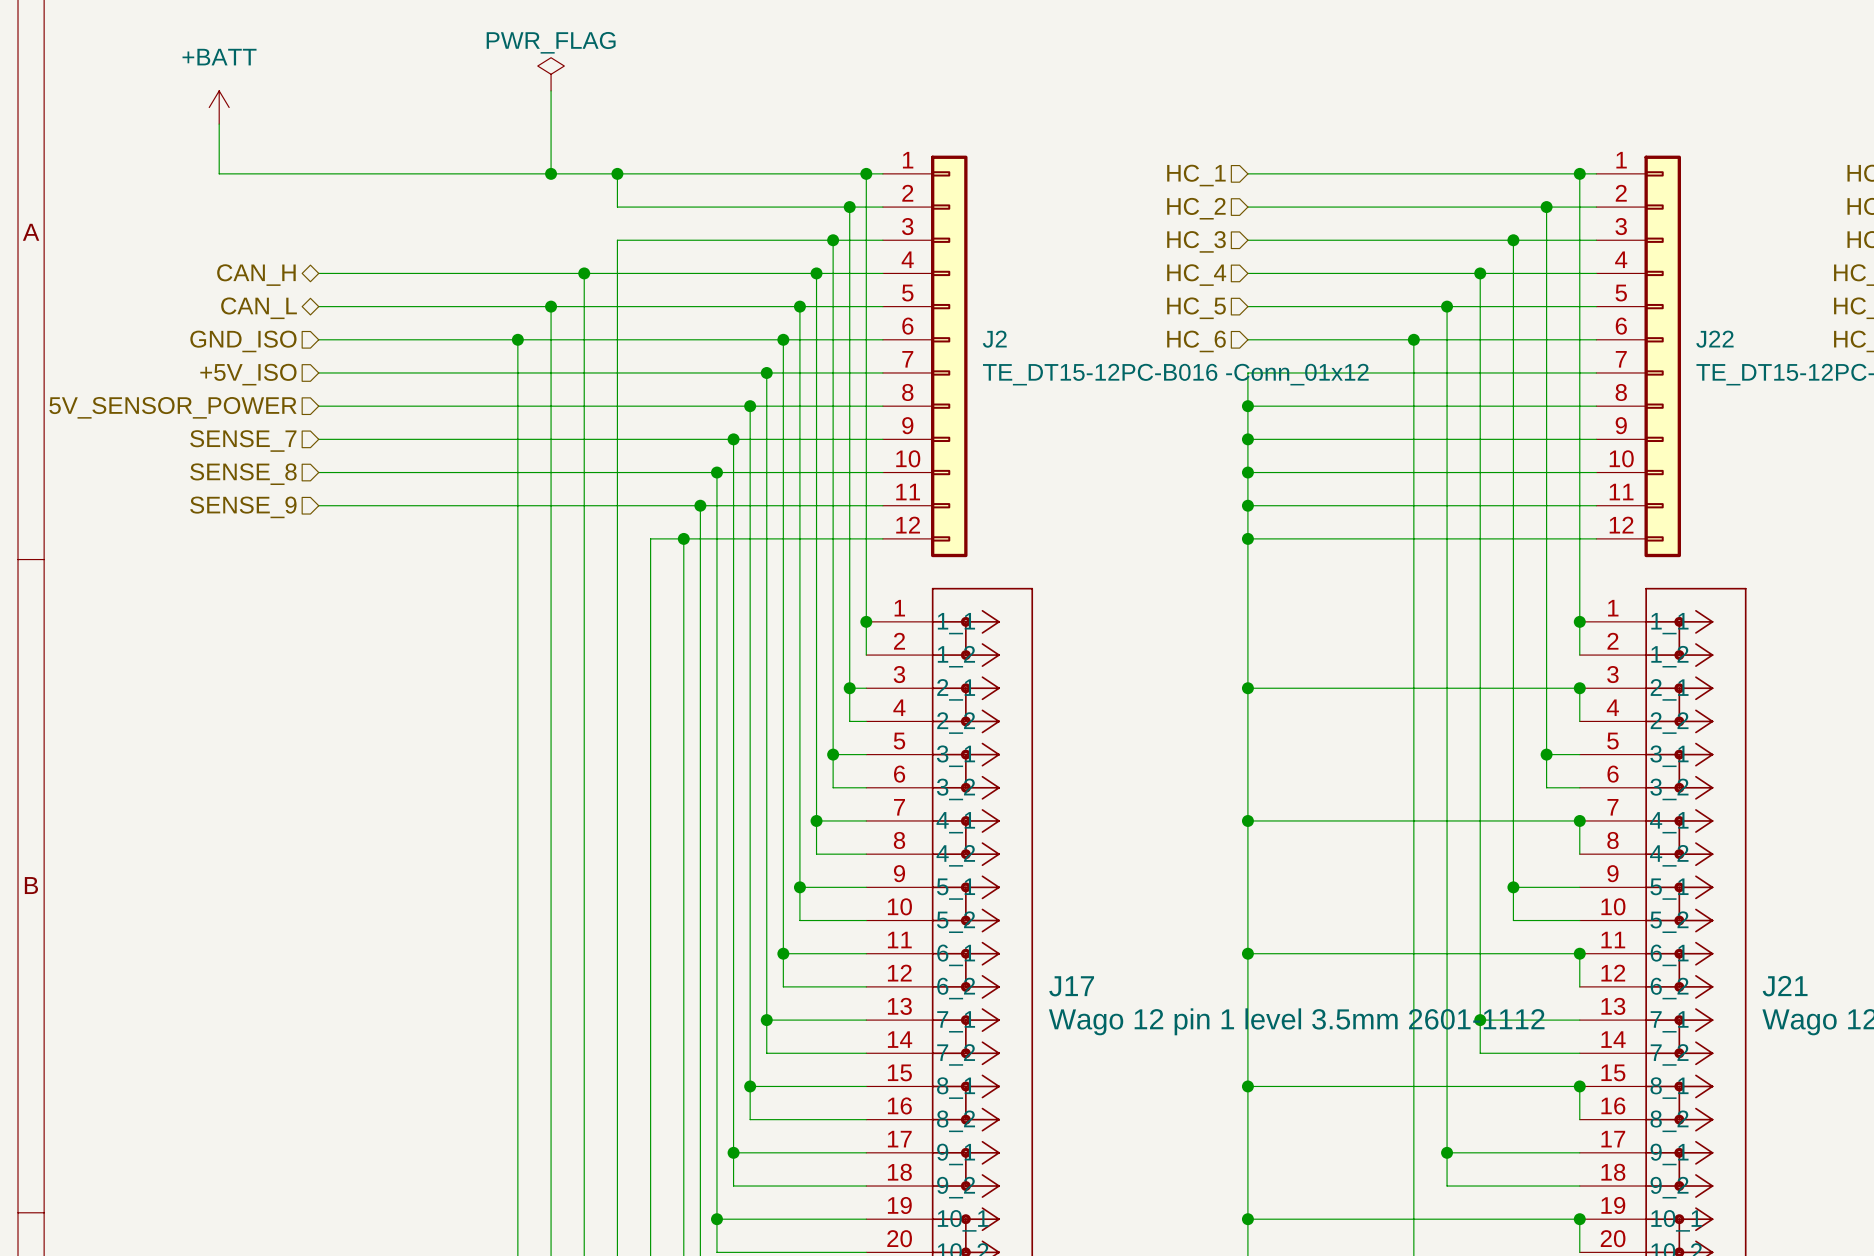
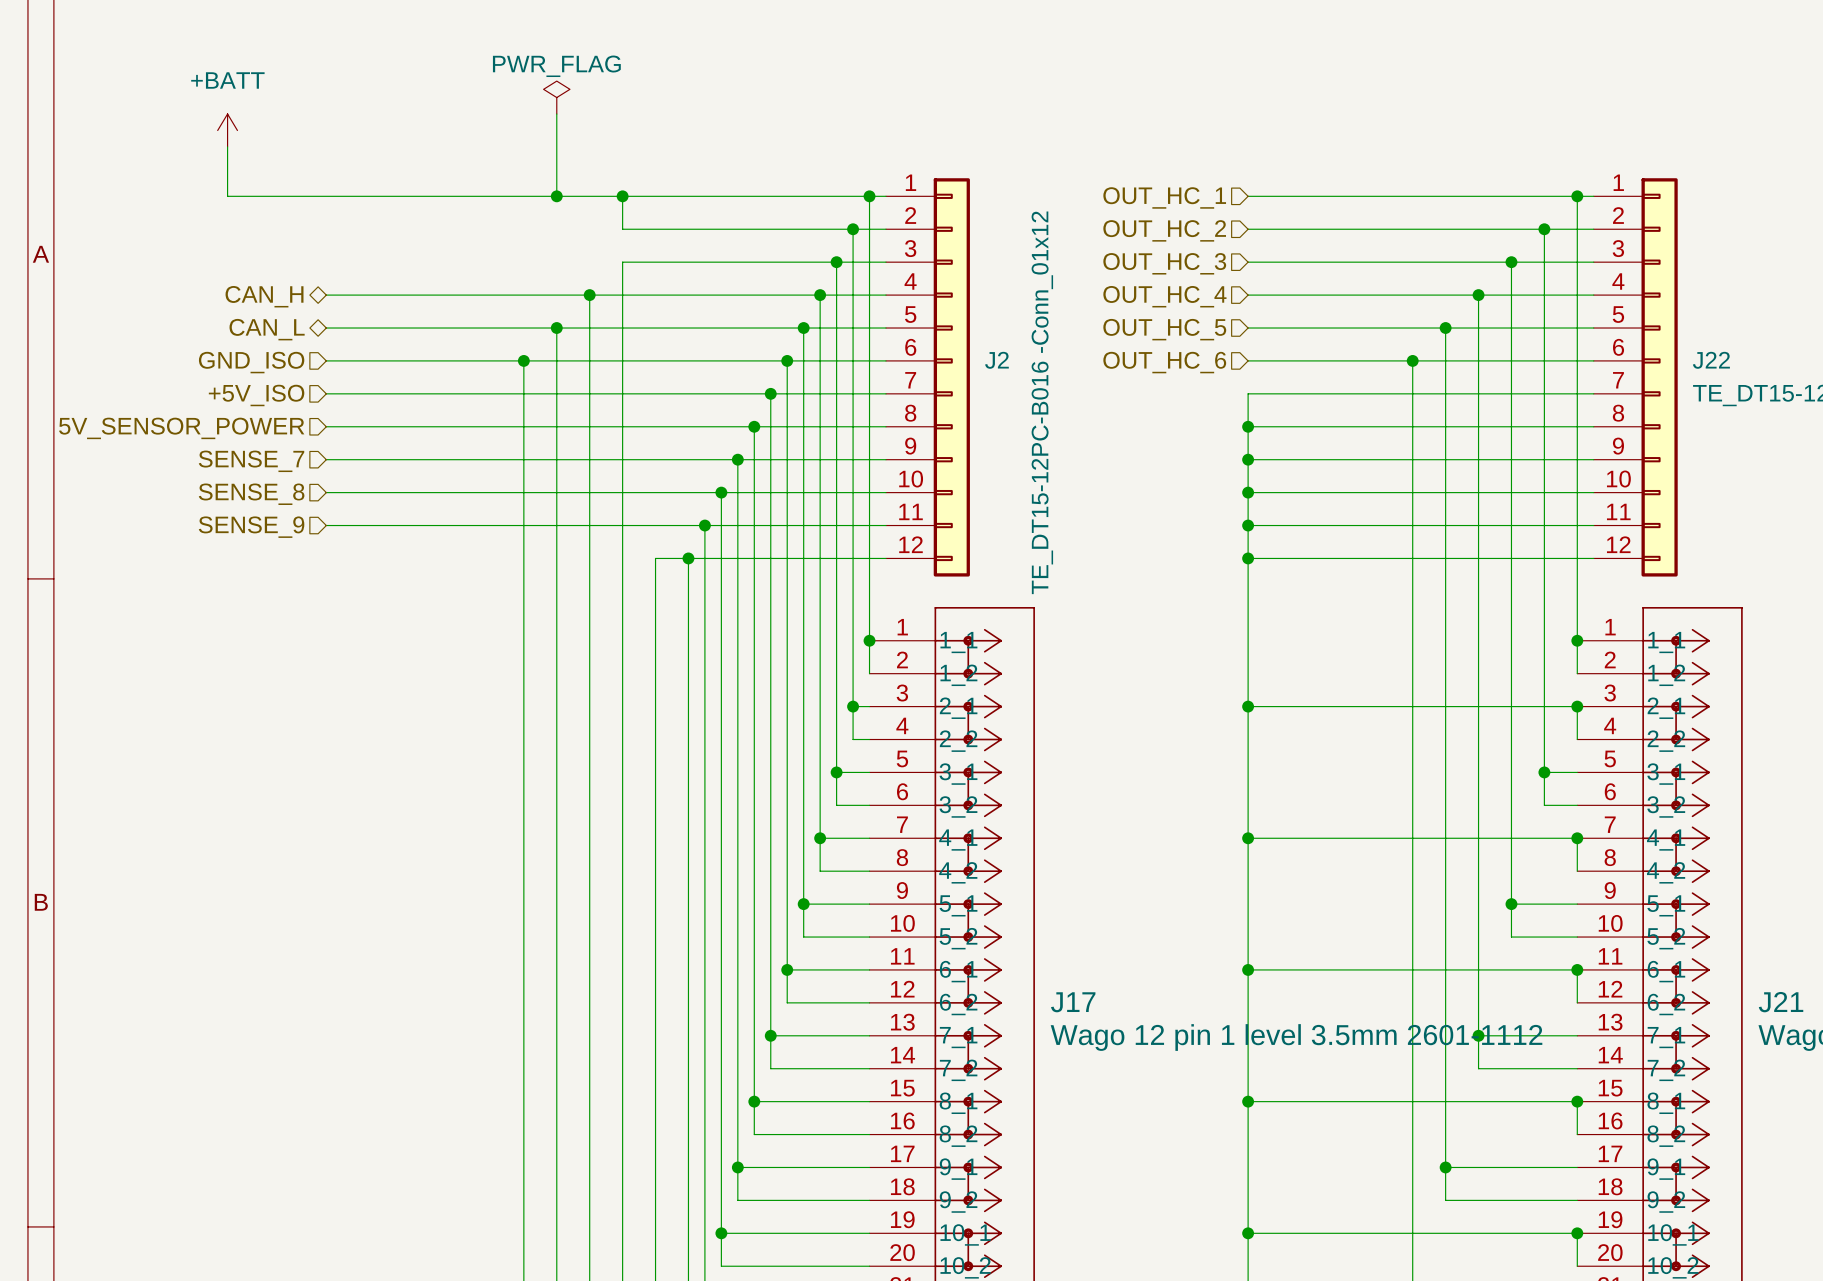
hierarchical label: HC_1 (1196, 175) -> OUT_HC_1 (1164, 197)
hierarchical label: HC_2 (1196, 208) -> OUT_HC_2 (1164, 230)
hierarchical label: HC_3 (1196, 241) -> OUT_HC_3 (1164, 263)
hierarchical label: HC_4 (1196, 275) -> OUT_HC_4 (1164, 296)
hierarchical label: HC_5 (1196, 308) -> OUT_HC_5 (1164, 329)
hierarchical label: HC_6 (1196, 341) -> OUT_HC_6 (1164, 362)
J2 value rotation: 0° (1175, 374) -> 90° counterclockwise (1042, 402)

